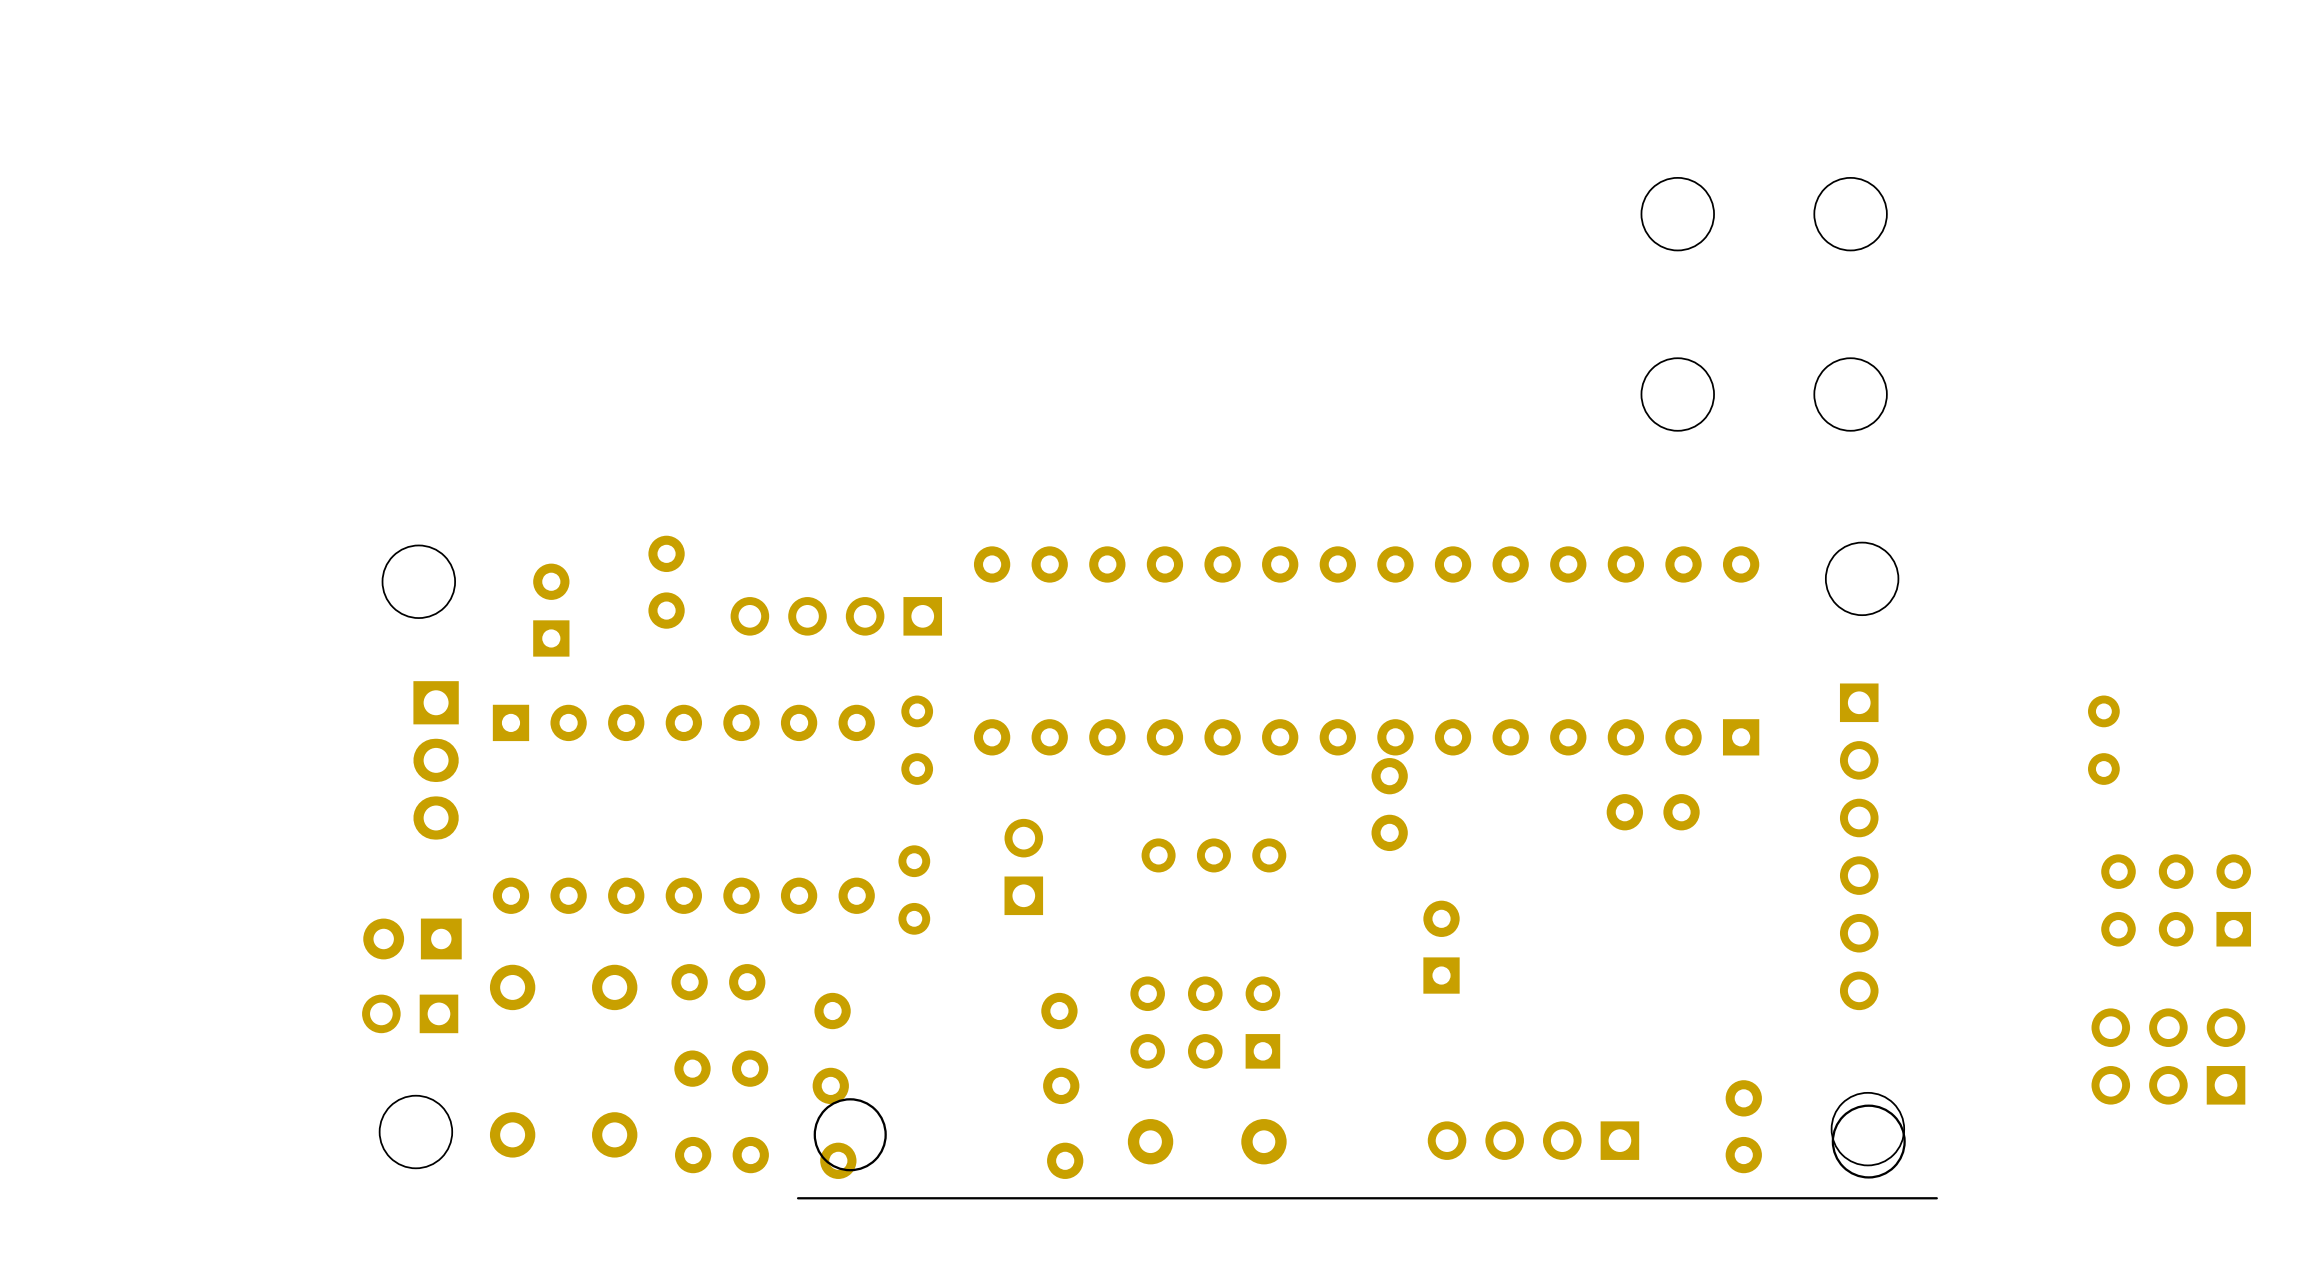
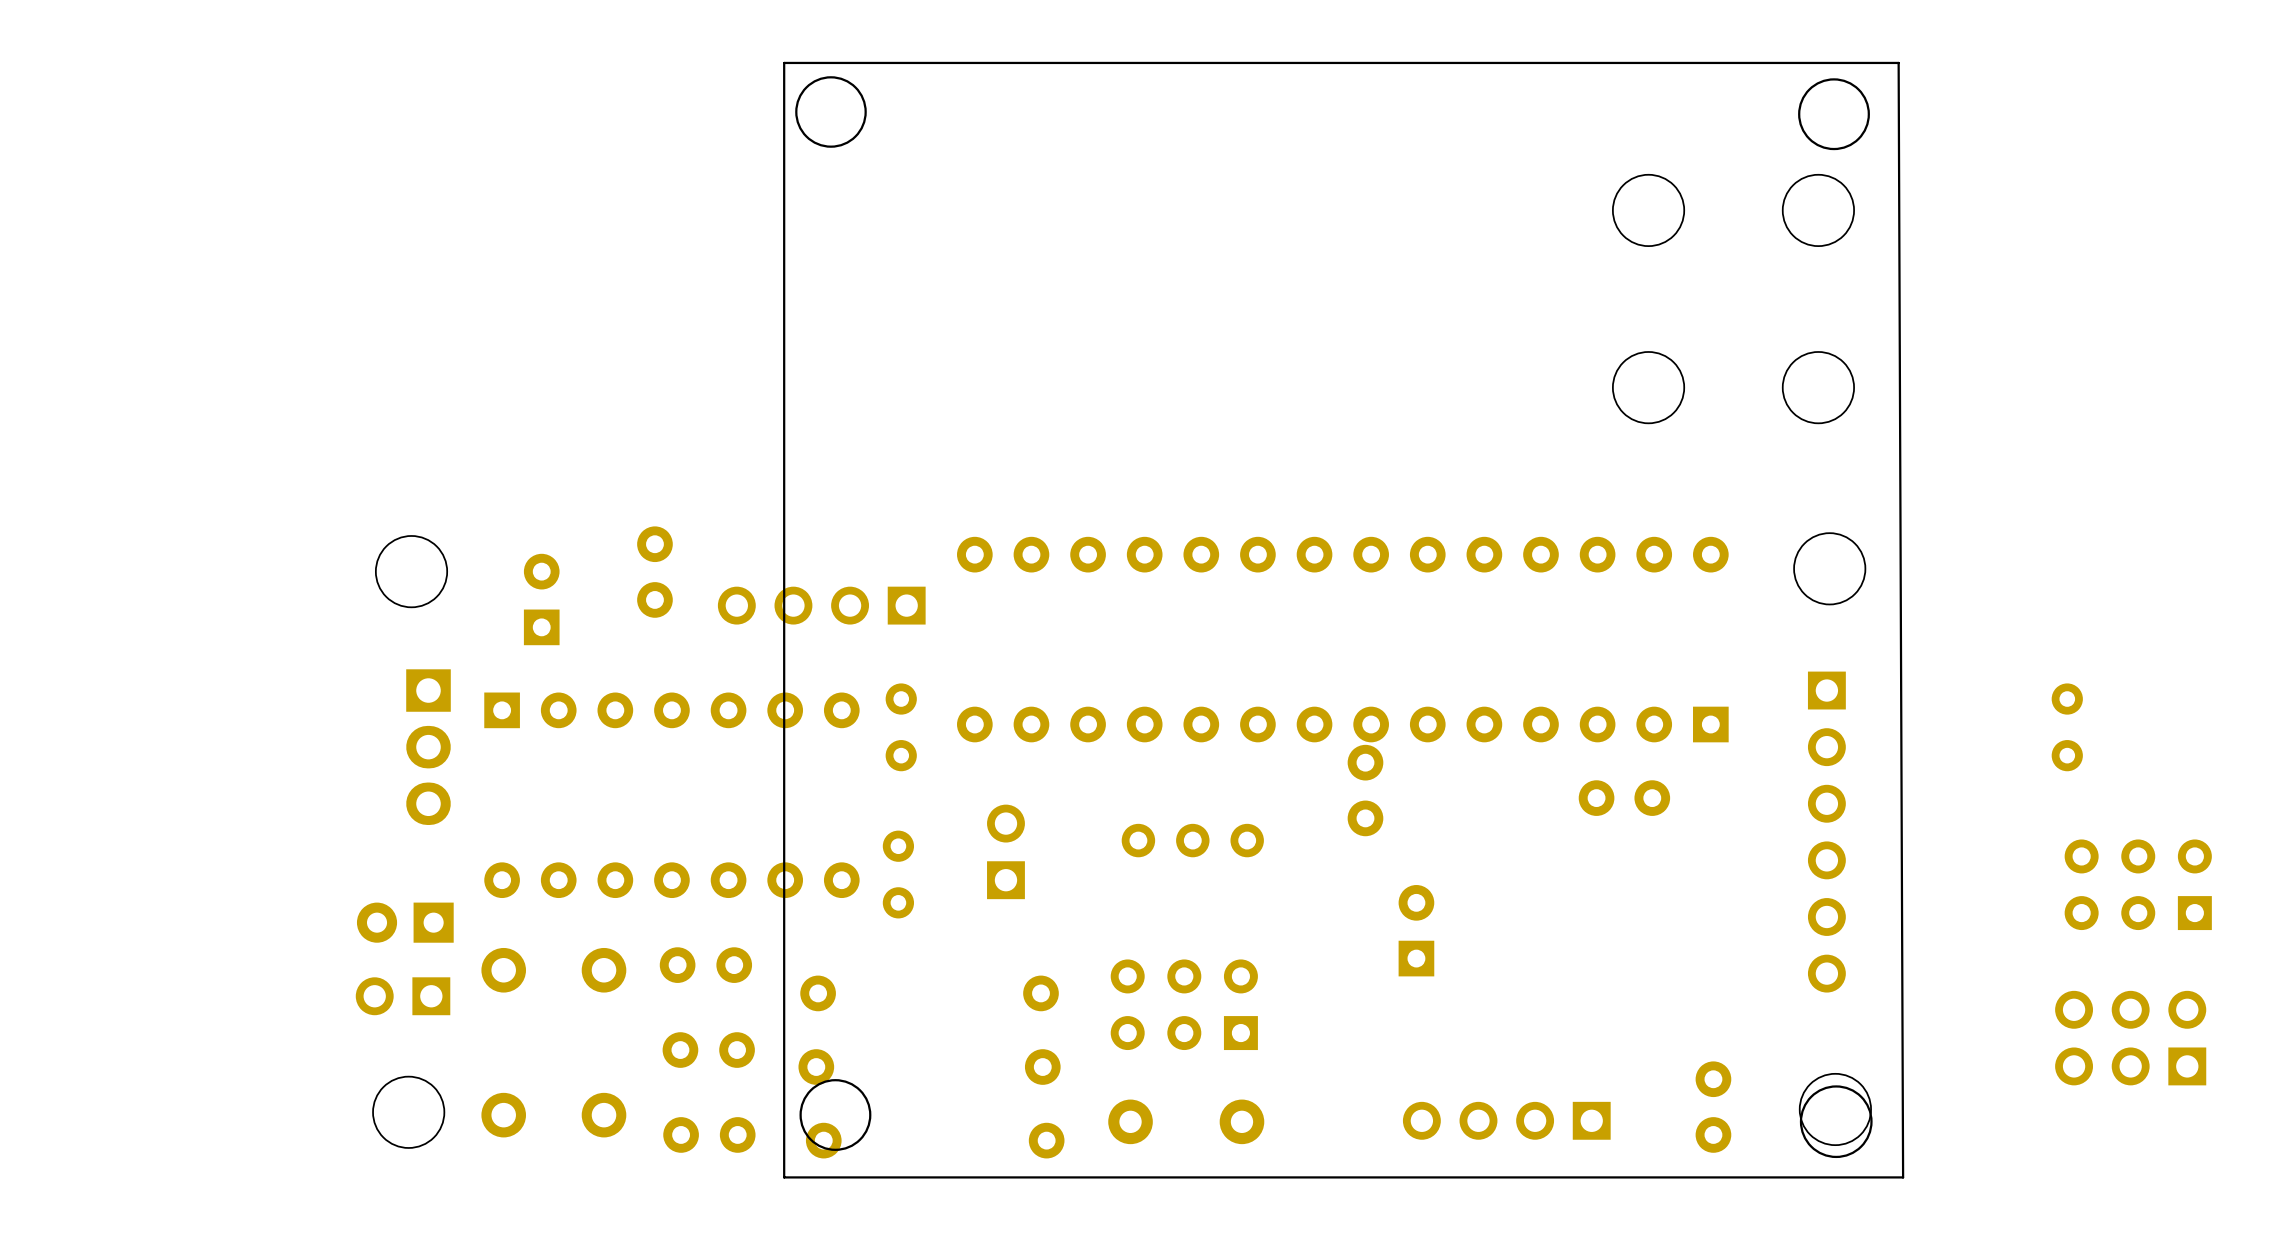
round board edge: none -> [795, 76, 867, 148]
round board edge: none -> [1798, 78, 1870, 151]
board edge: none -> (1903, 1177) (1898, 62) (784, 62) (784, 1177)

